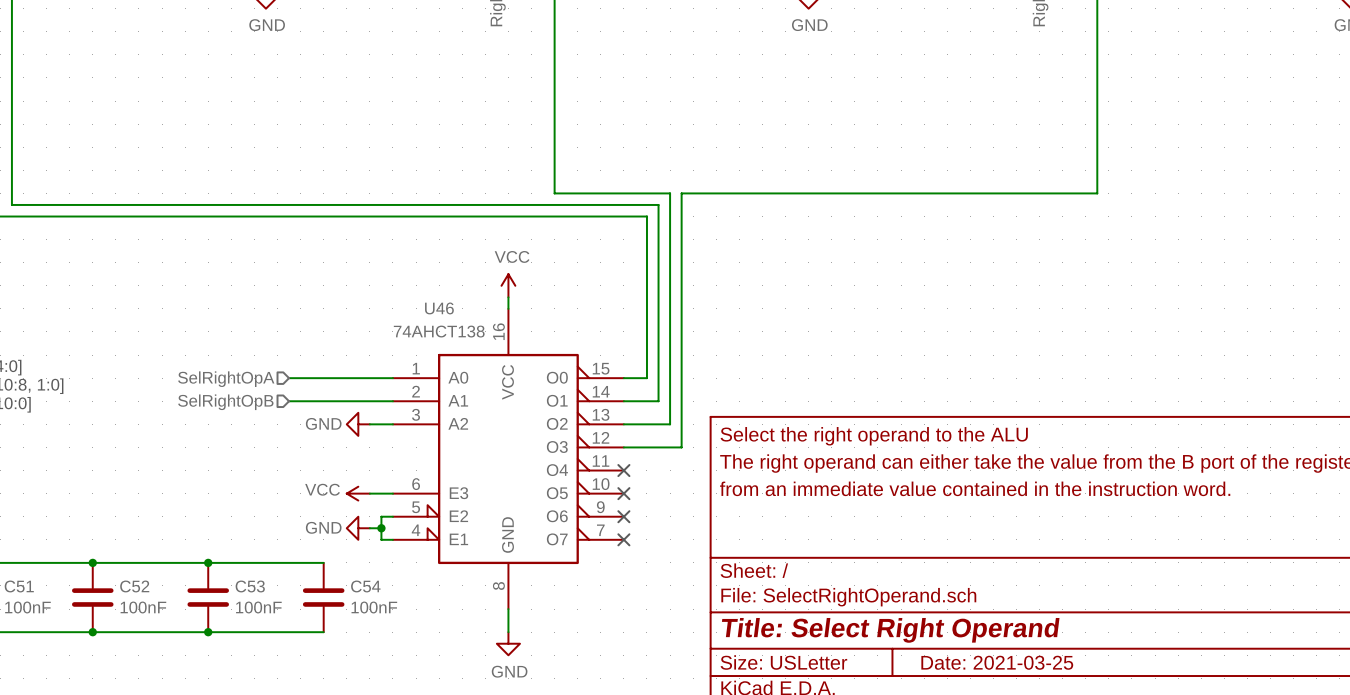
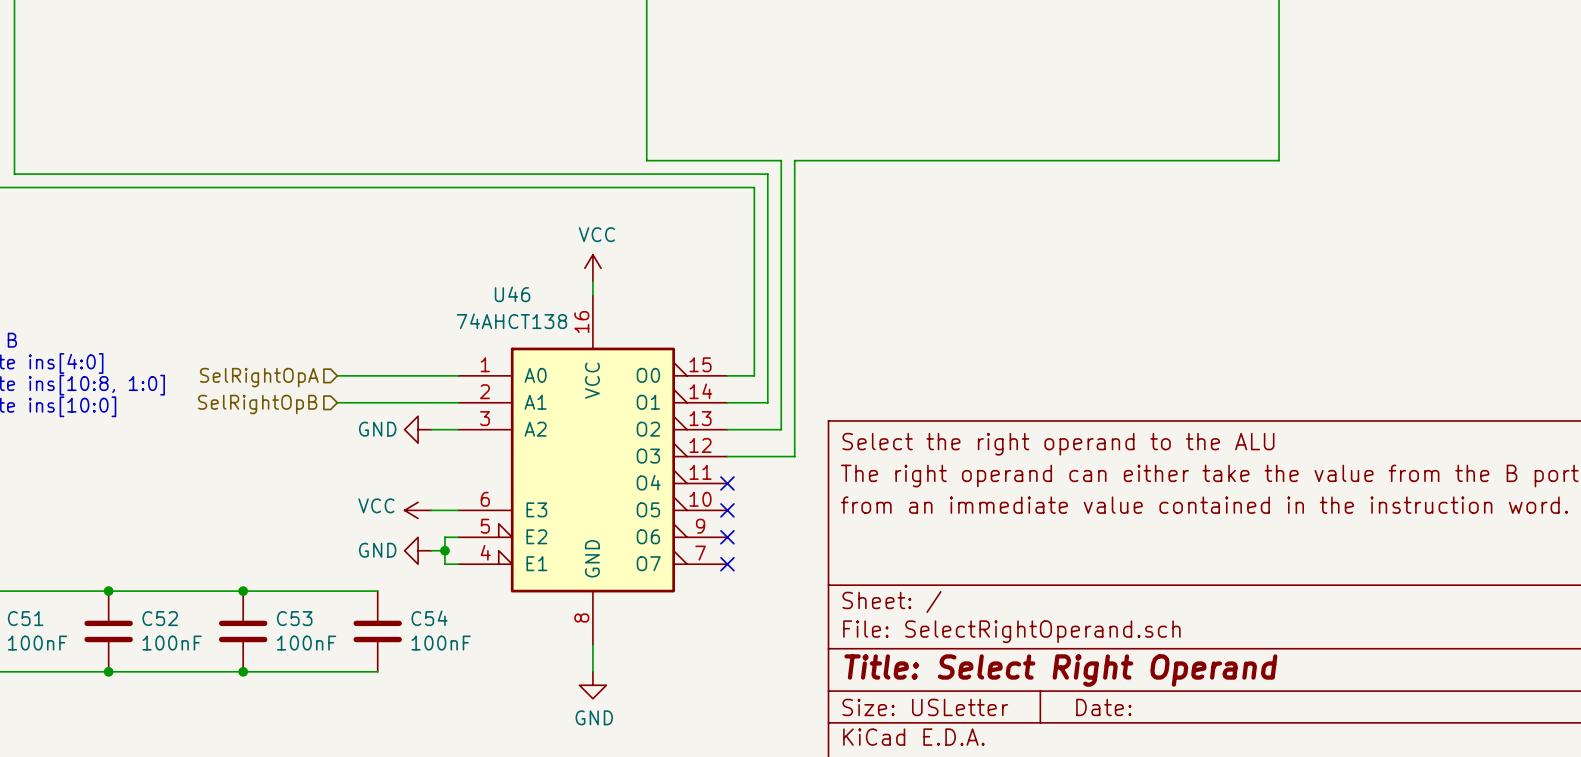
title block: Date: 2021-03-25 (997, 662) -> Date: (1103, 707)

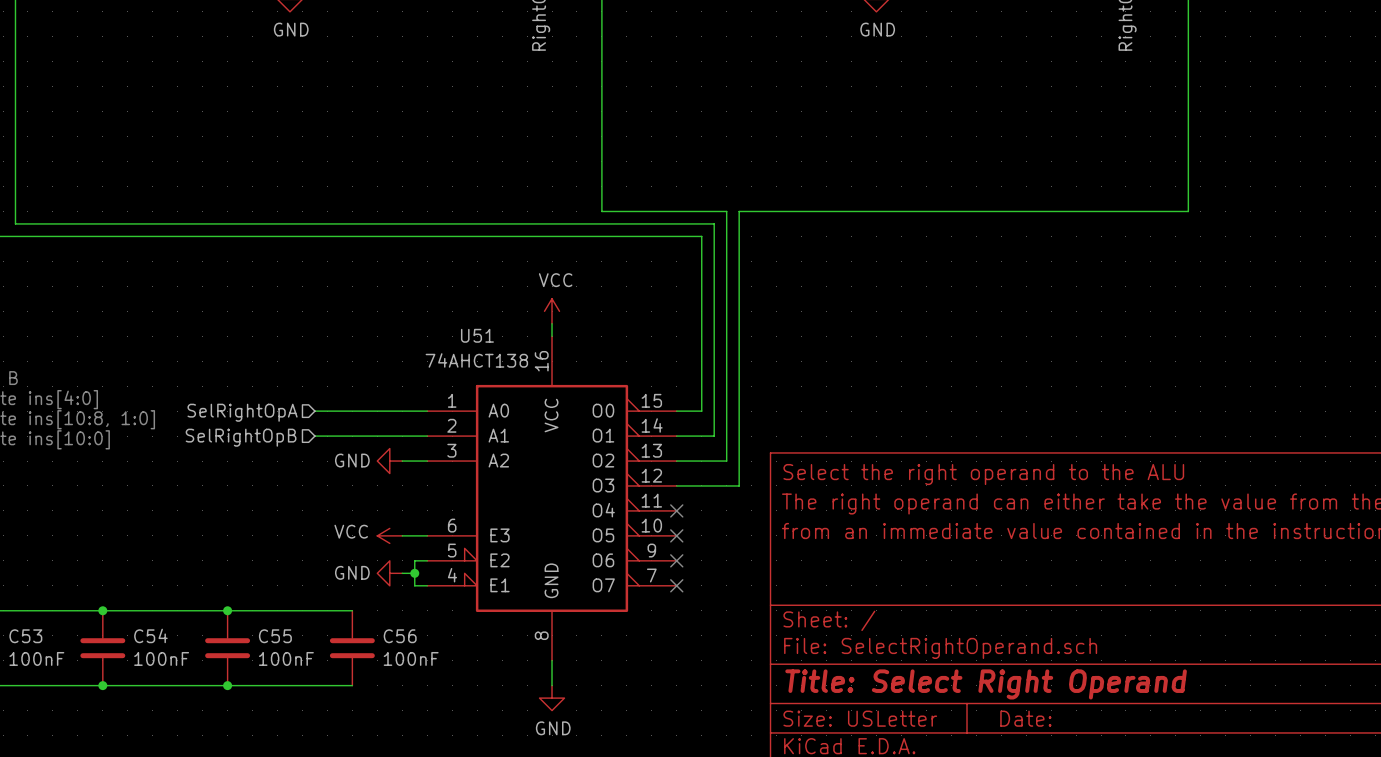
U46 name: U46 (512, 294) -> U51 (477, 335)
C51 name: C51 (25, 618) -> C53 (25, 636)
C52 name: C52 (160, 618) -> C54 (150, 635)
C53 name: C53 (294, 618) -> C55 (275, 636)
C54 name: C54 (429, 618) -> C56 (400, 636)

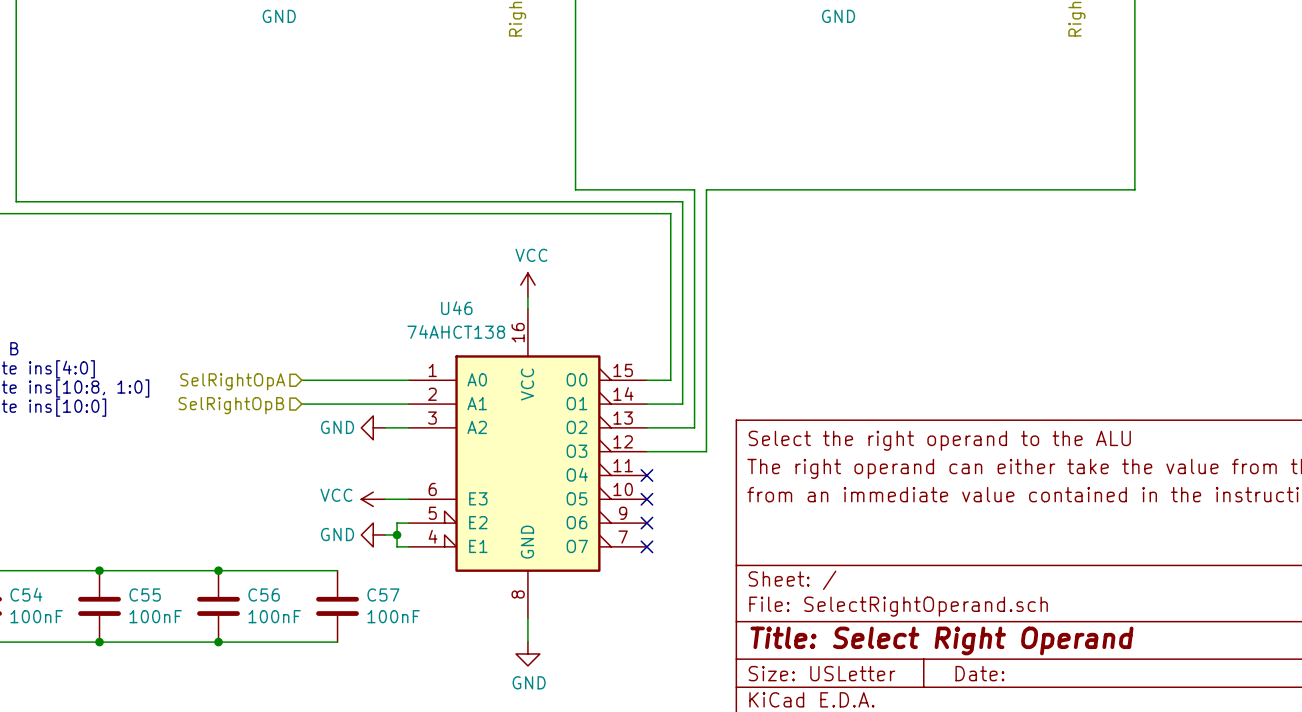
U51 name: U51 (477, 335) -> U46 (456, 308)
C54 name: C54 (150, 635) -> C55 (145, 594)
C53 name: C53 (25, 636) -> C54 (26, 594)
C55 name: C55 (275, 636) -> C56 (264, 594)
C56 name: C56 (400, 636) -> C57 (383, 594)

